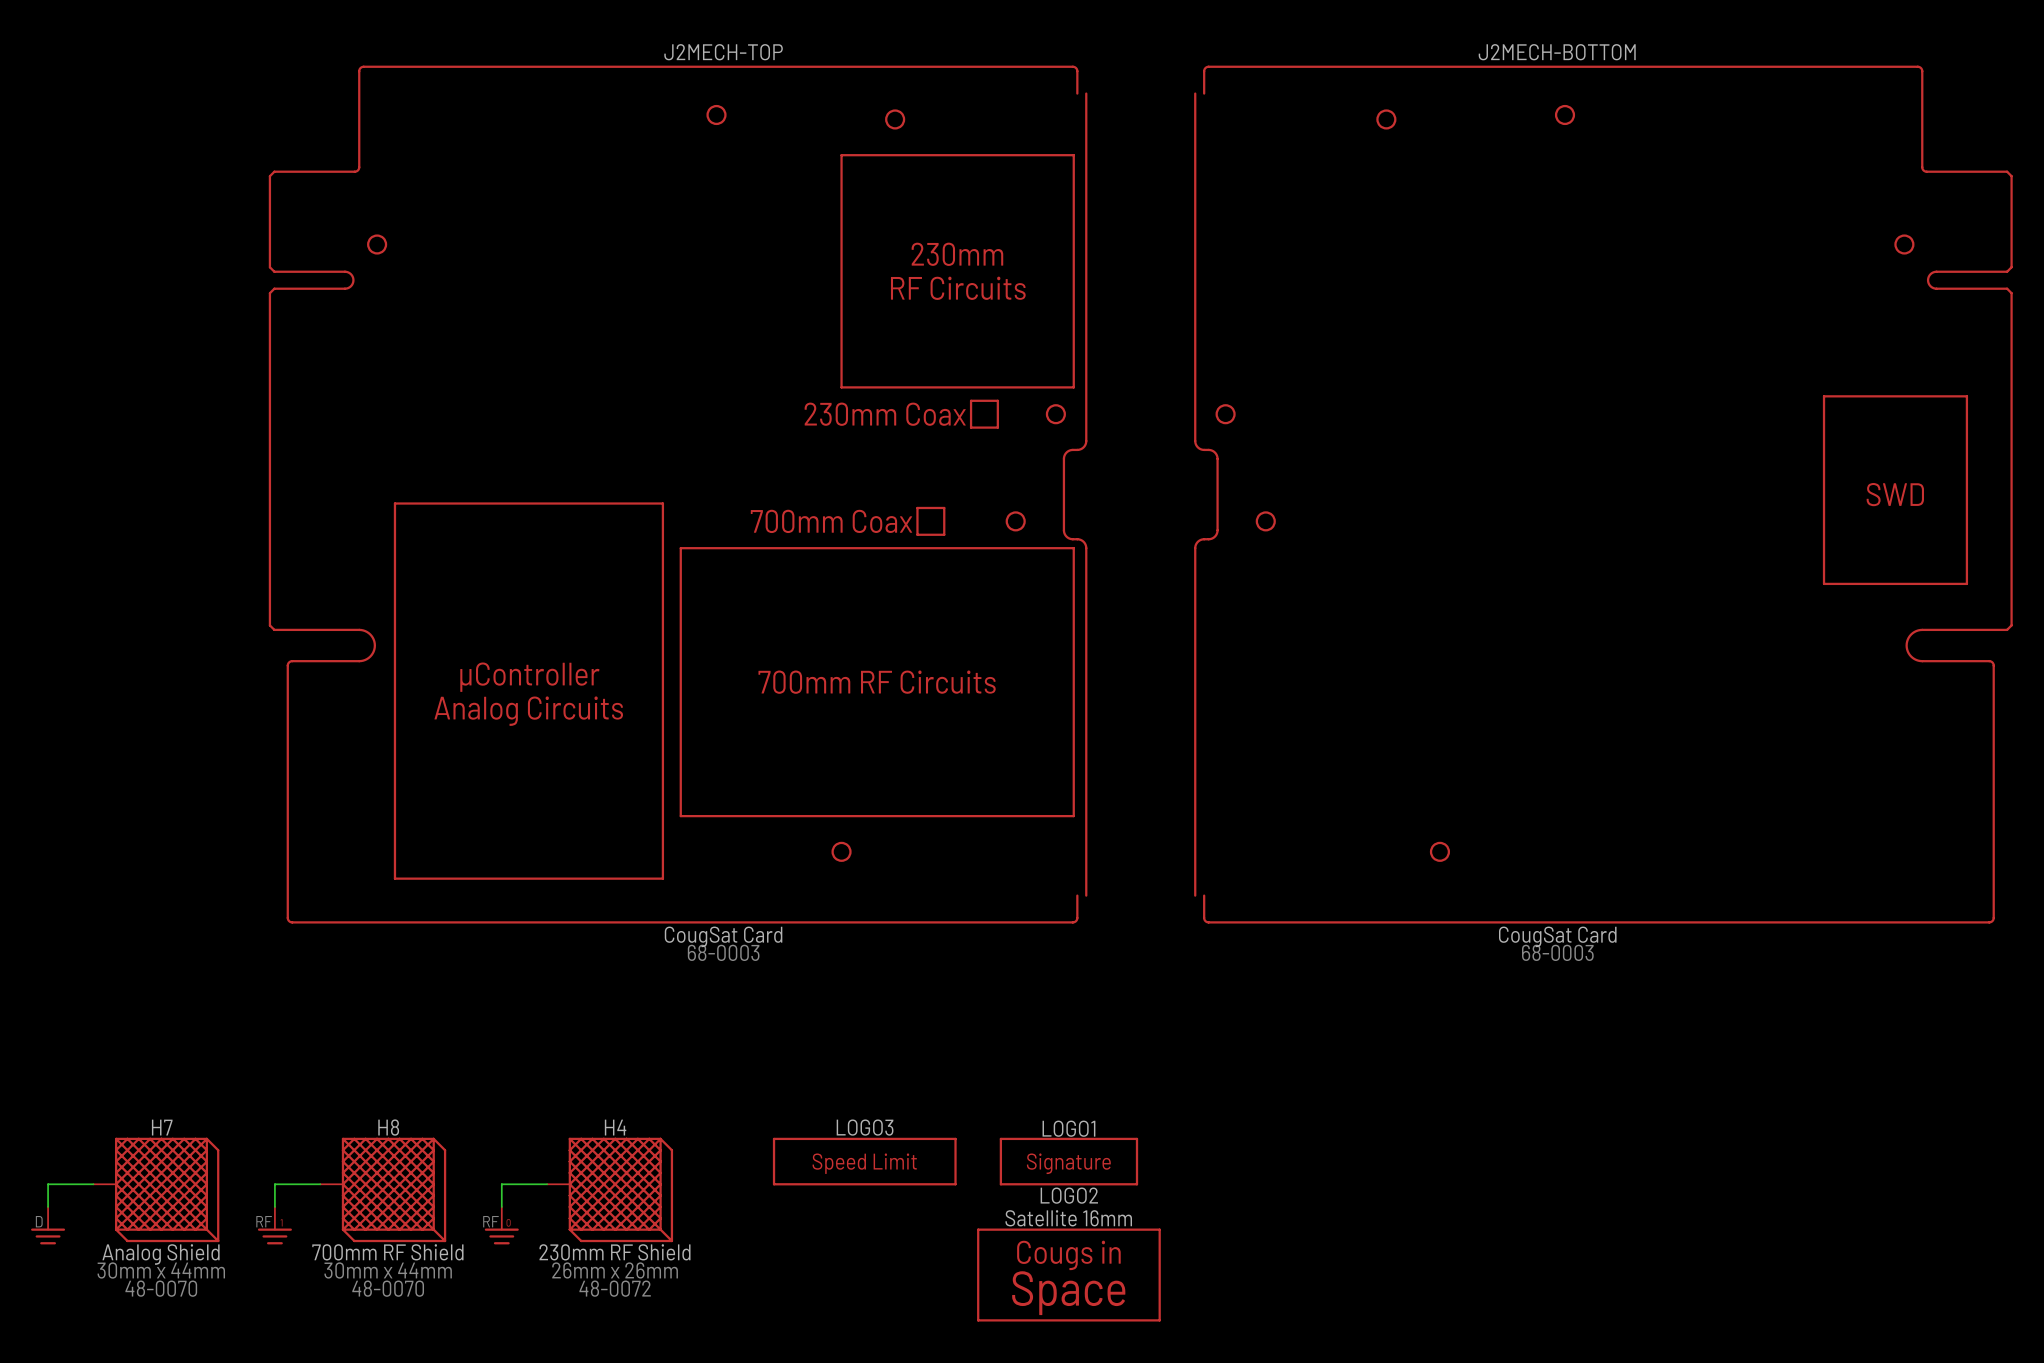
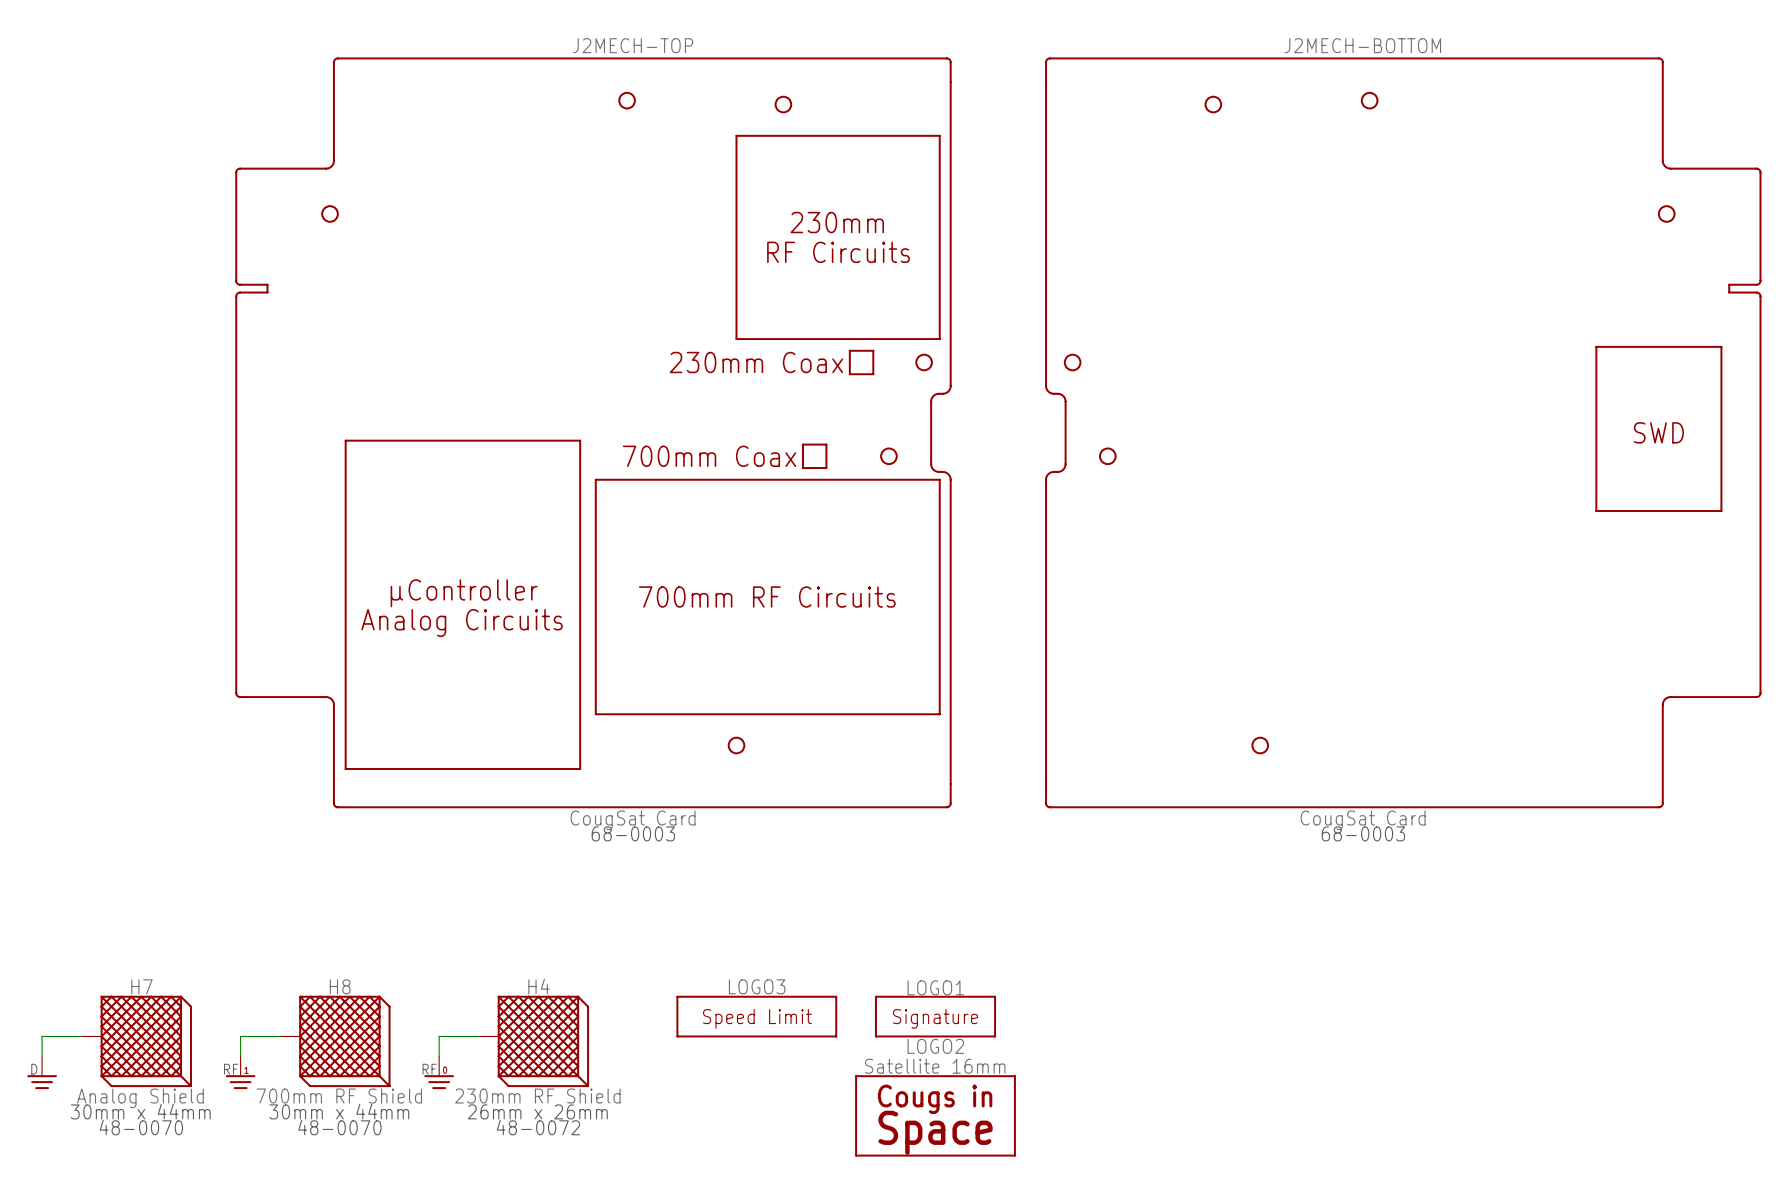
J2MECH-TOP symbol: [268, 65, 1079, 924] -> [235, 57, 952, 809]
J2MECH-BOTTOM symbol: [1203, 65, 2013, 924] -> [1045, 57, 1762, 809]

